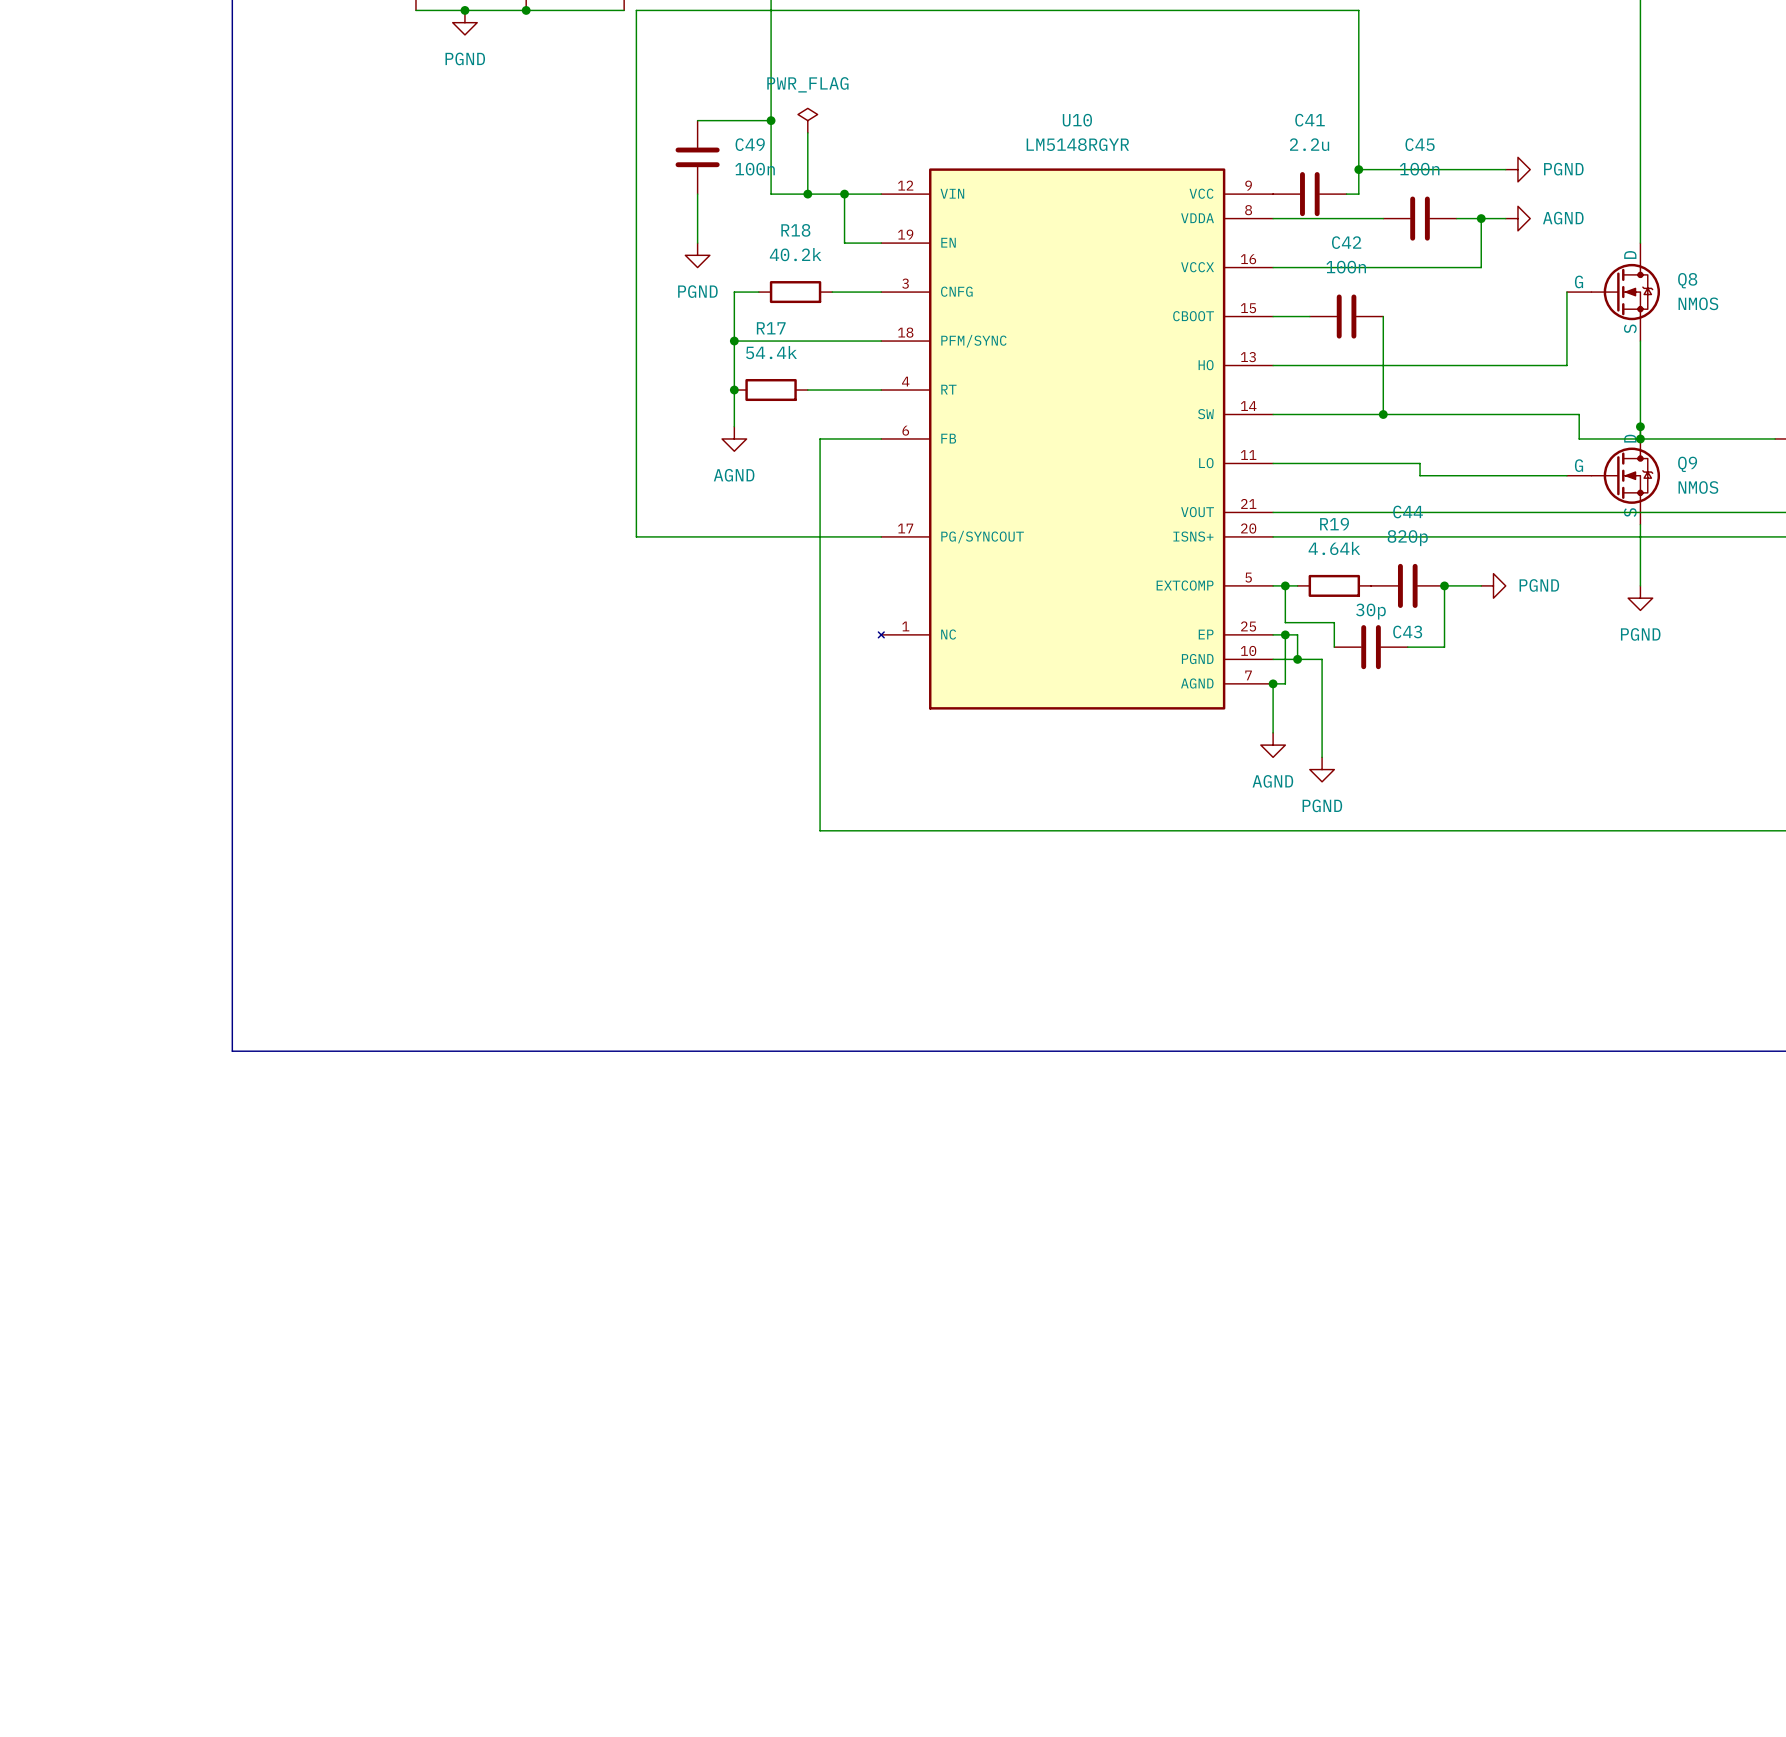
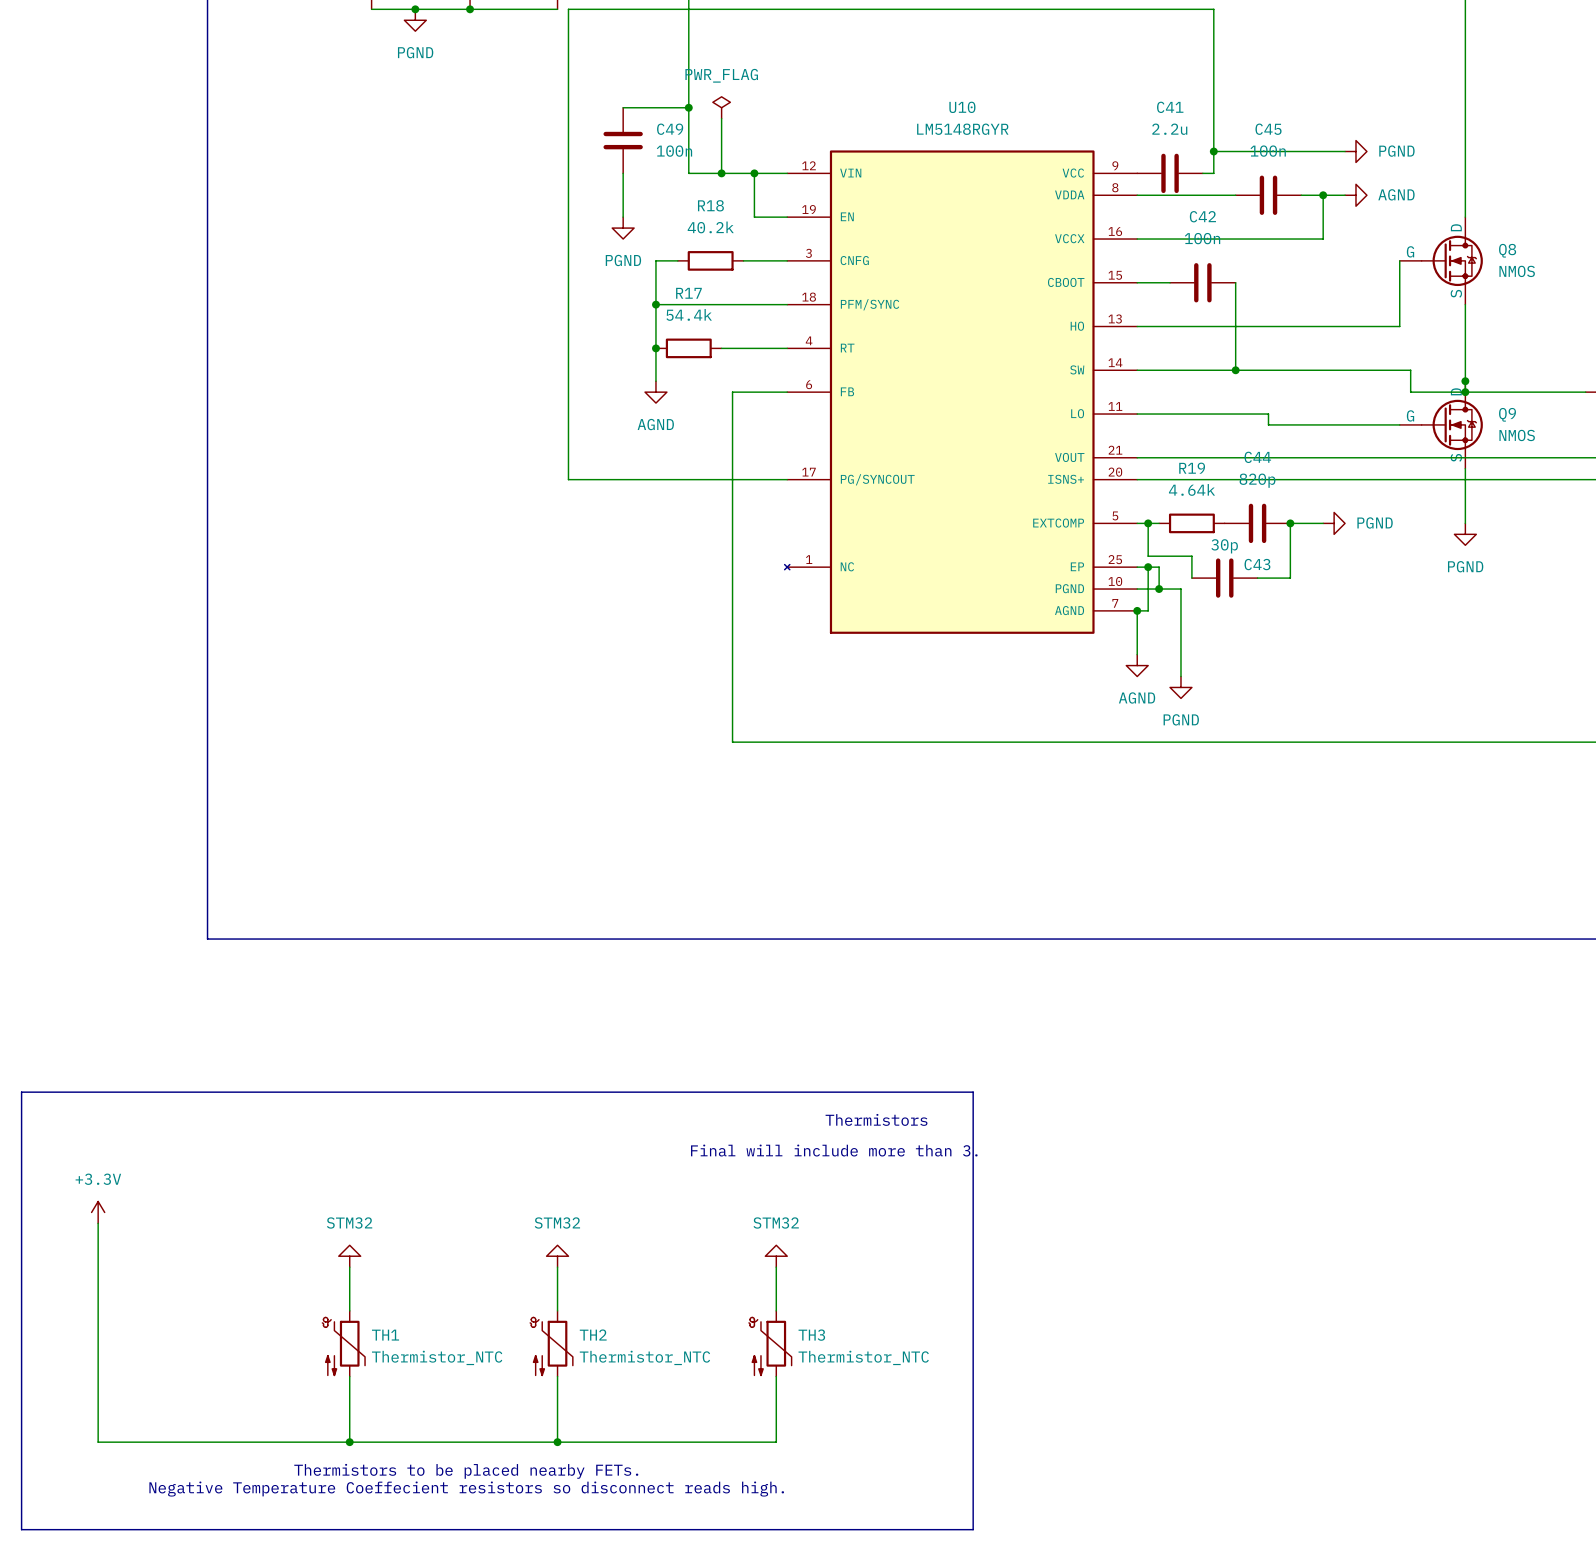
line: none -> (21, 1092) (973, 1092) (973, 1529) (21, 1529) (21, 1092)
text: none -> Thermistors (876, 1119)
text: none -> Final will include more than 3. (834, 1150)
power symbol: none -> +3.3V (98, 1212)
wire: none -> (98, 1223) (98, 1442) (776, 1442) (776, 1376)
power symbol: none -> STM32 (349, 1256)
power symbol: none -> STM32 (557, 1256)
power symbol: none -> STM32 (776, 1256)
wire: none -> (349, 1267) (349, 1310)
wire: none -> (557, 1267) (557, 1310)
wire: none -> (776, 1267) (776, 1310)
TH1: none -> Thermistor_NTC (343, 1343)
TH2: none -> Thermistor_NTC (551, 1343)
TH3: none -> Thermistor_NTC (770, 1343)
wire: none -> (349, 1376) (349, 1442)
wire: none -> (557, 1376) (557, 1442)
junction: none -> (349, 1442)
junction: none -> (557, 1442)
text: none -> Thermistors to be placed nearby FETs. (466, 1471)
text: none -> Negative Temperature Coeffecient resistors so disconnect reads high. (466, 1489)

